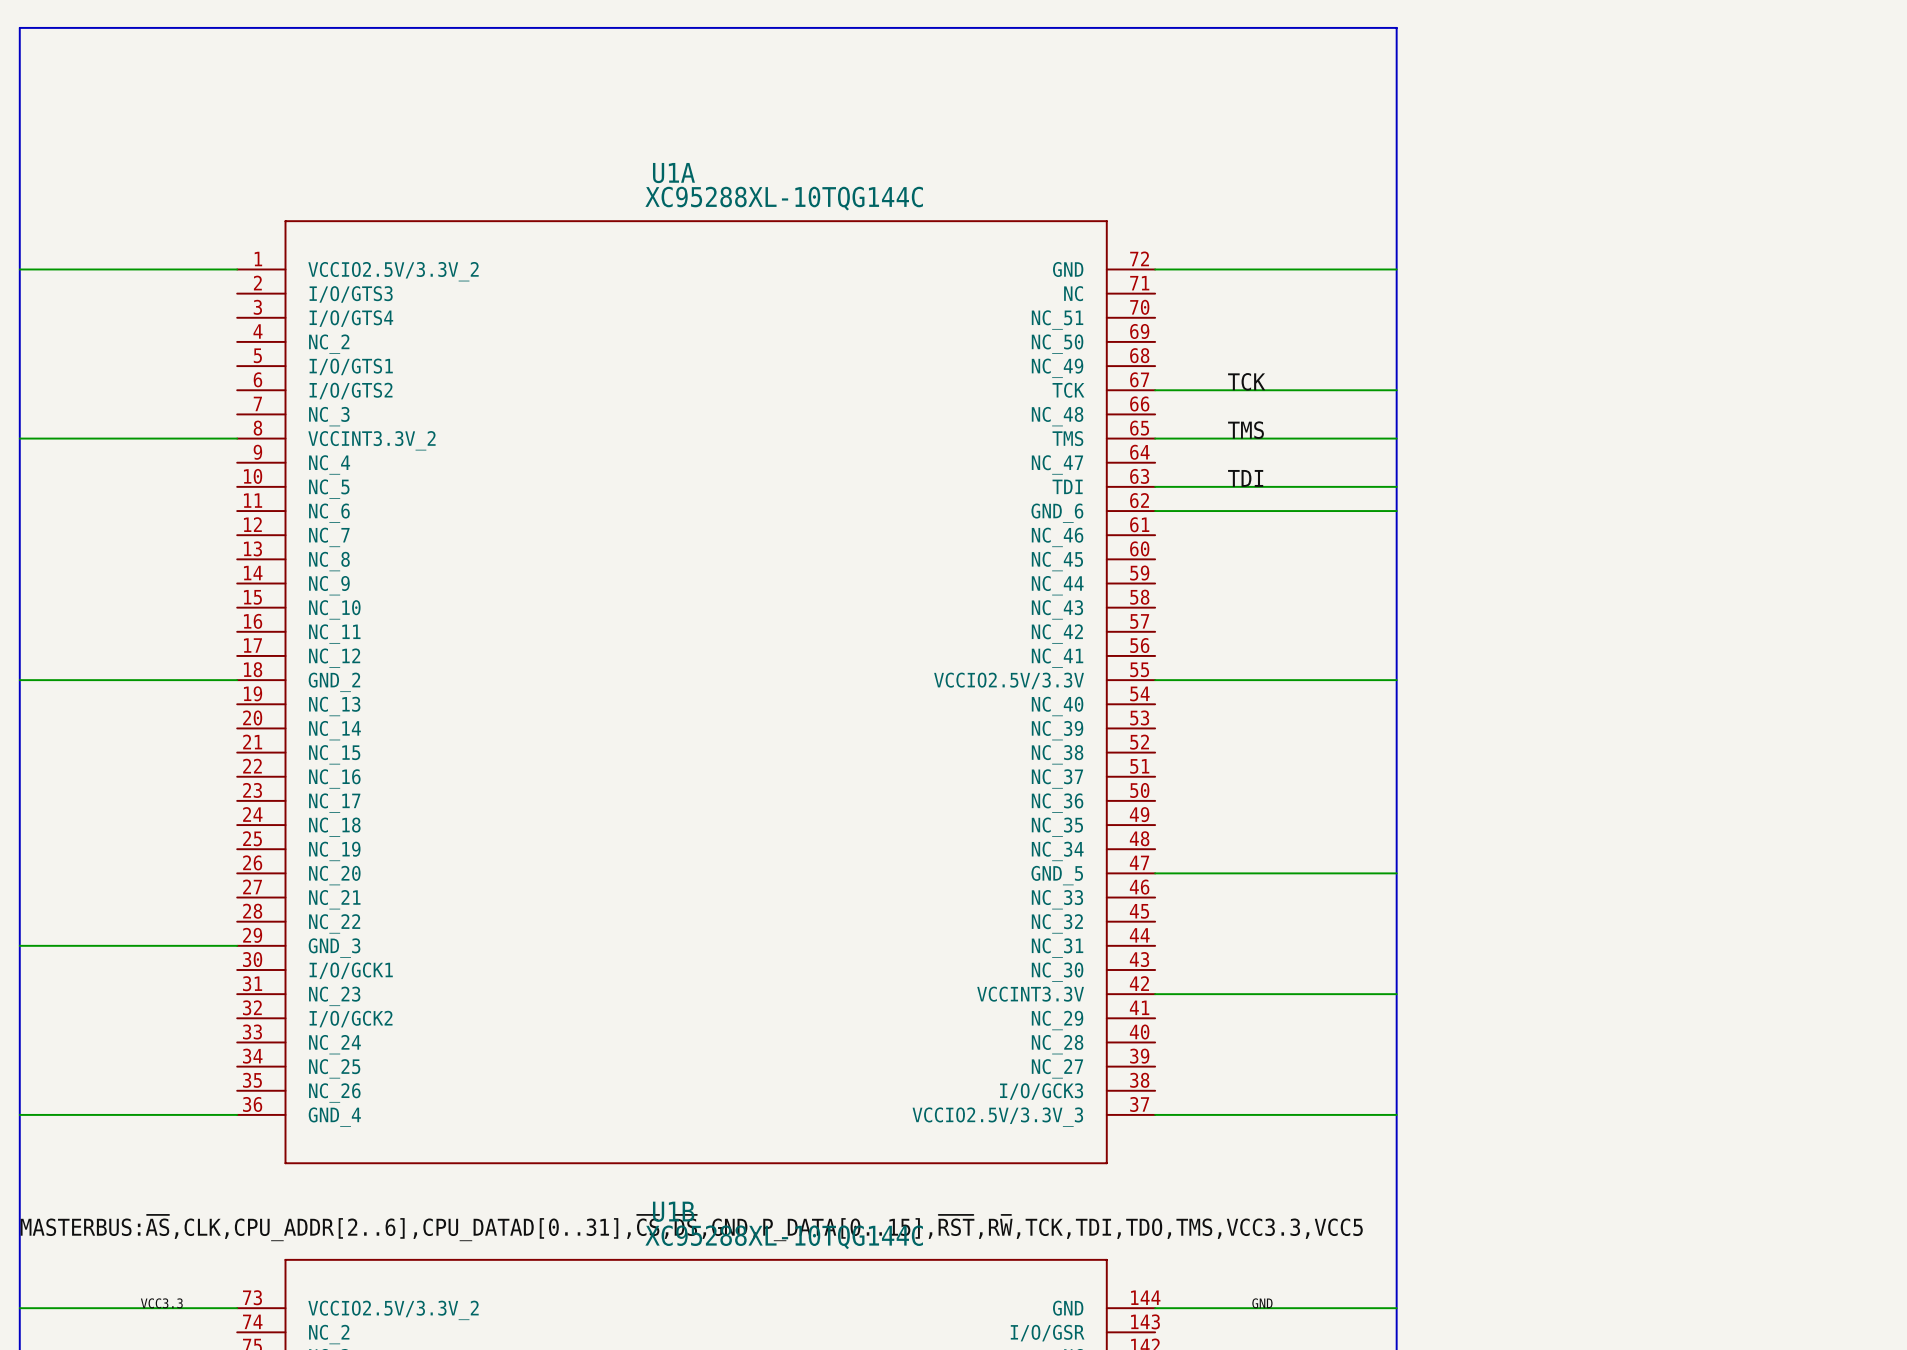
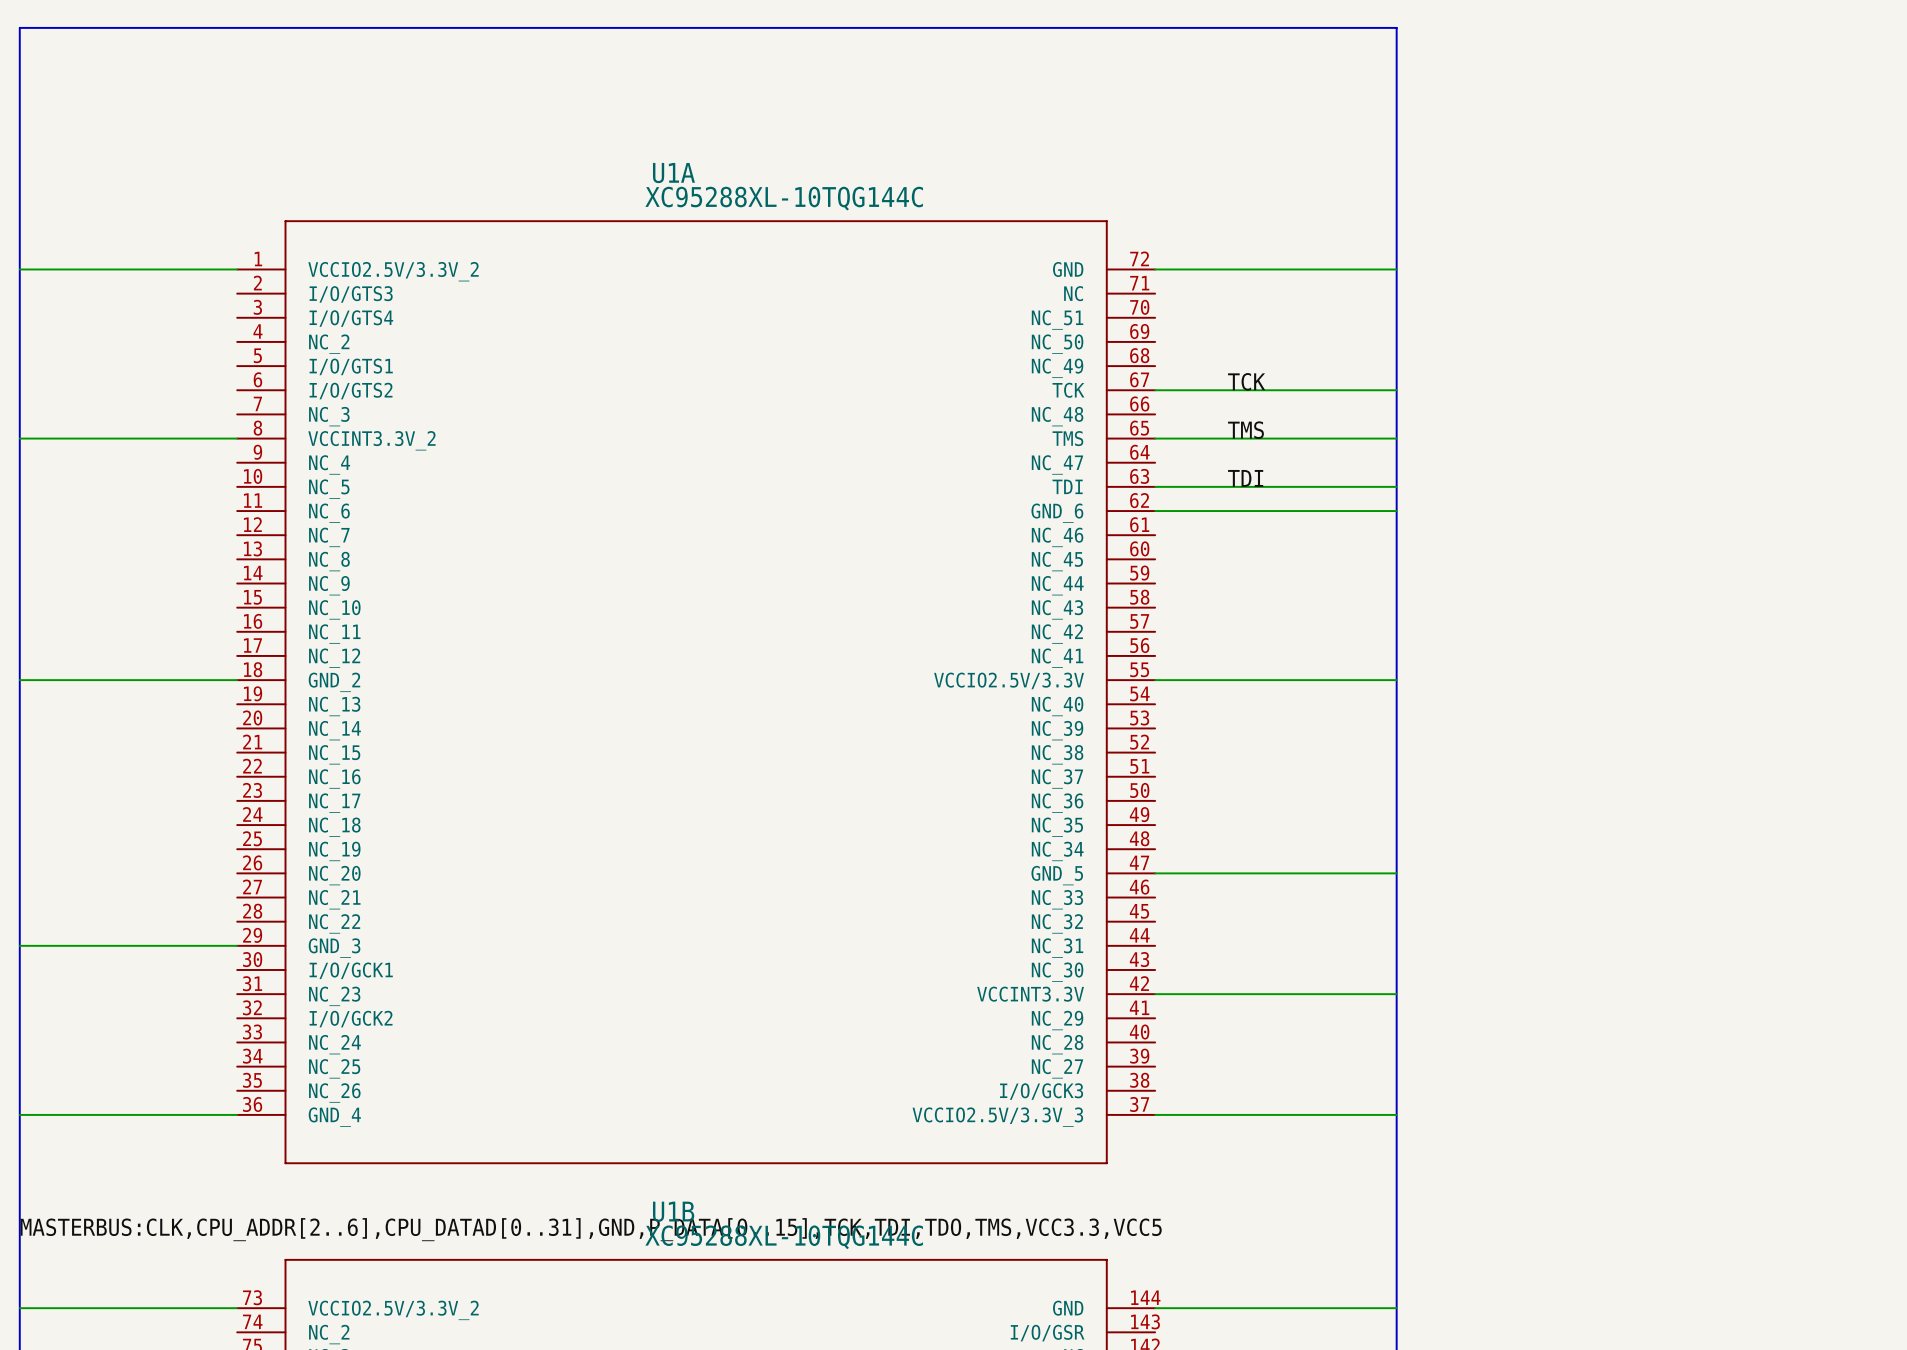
label: MASTERBUS:~{AS},CLK,CPU_ADDR[2..6],CPU_DATAD[0..31],~{CS},~{DS},GND,P_DATA[0..15],~{RST},R~{W},TCK,TDI,TDO,TMS,VCC3.3,VCC5 (691, 1228) -> MASTERBUS:CLK,CPU_ADDR[2..6],CPU_DATAD[0..31],GND,P_DATA[0..15],TCK,TDI,TDO,TMS,VCC3.3,VCC5 (591, 1229)
label: VCC3.3 (161, 1303) -> none
label: GND (1262, 1303) -> none

